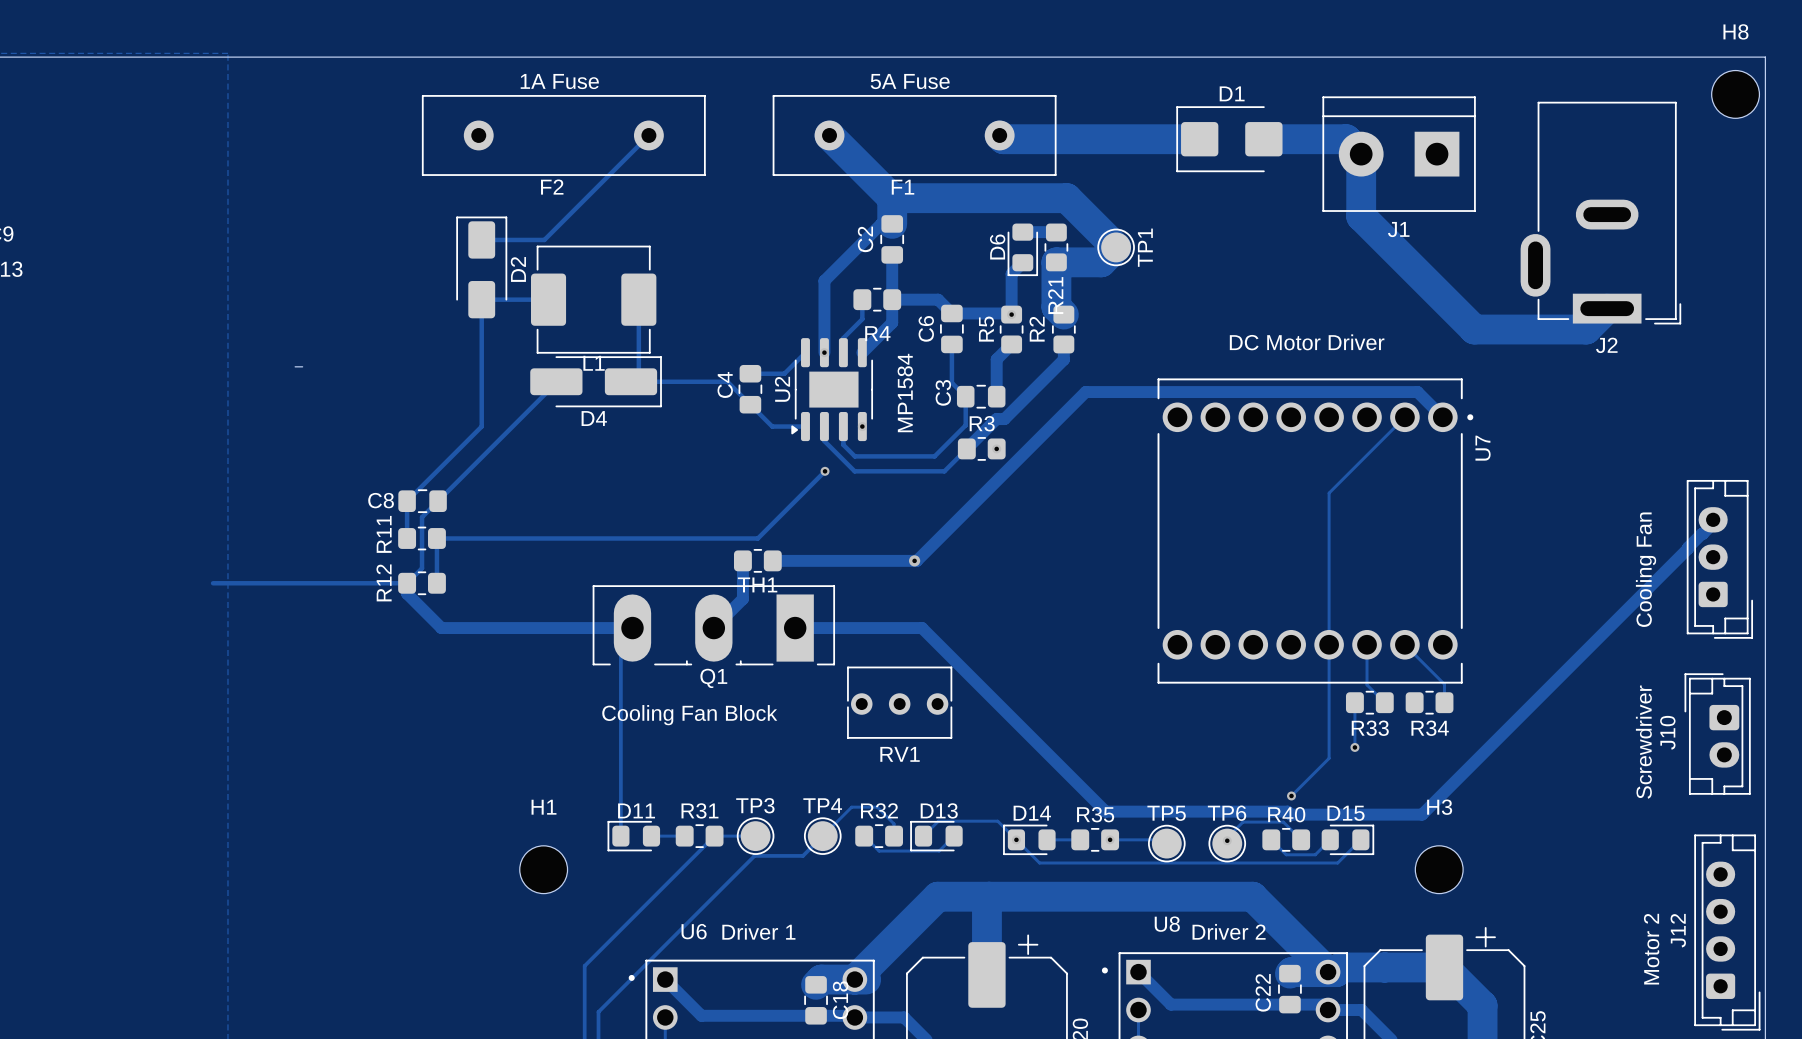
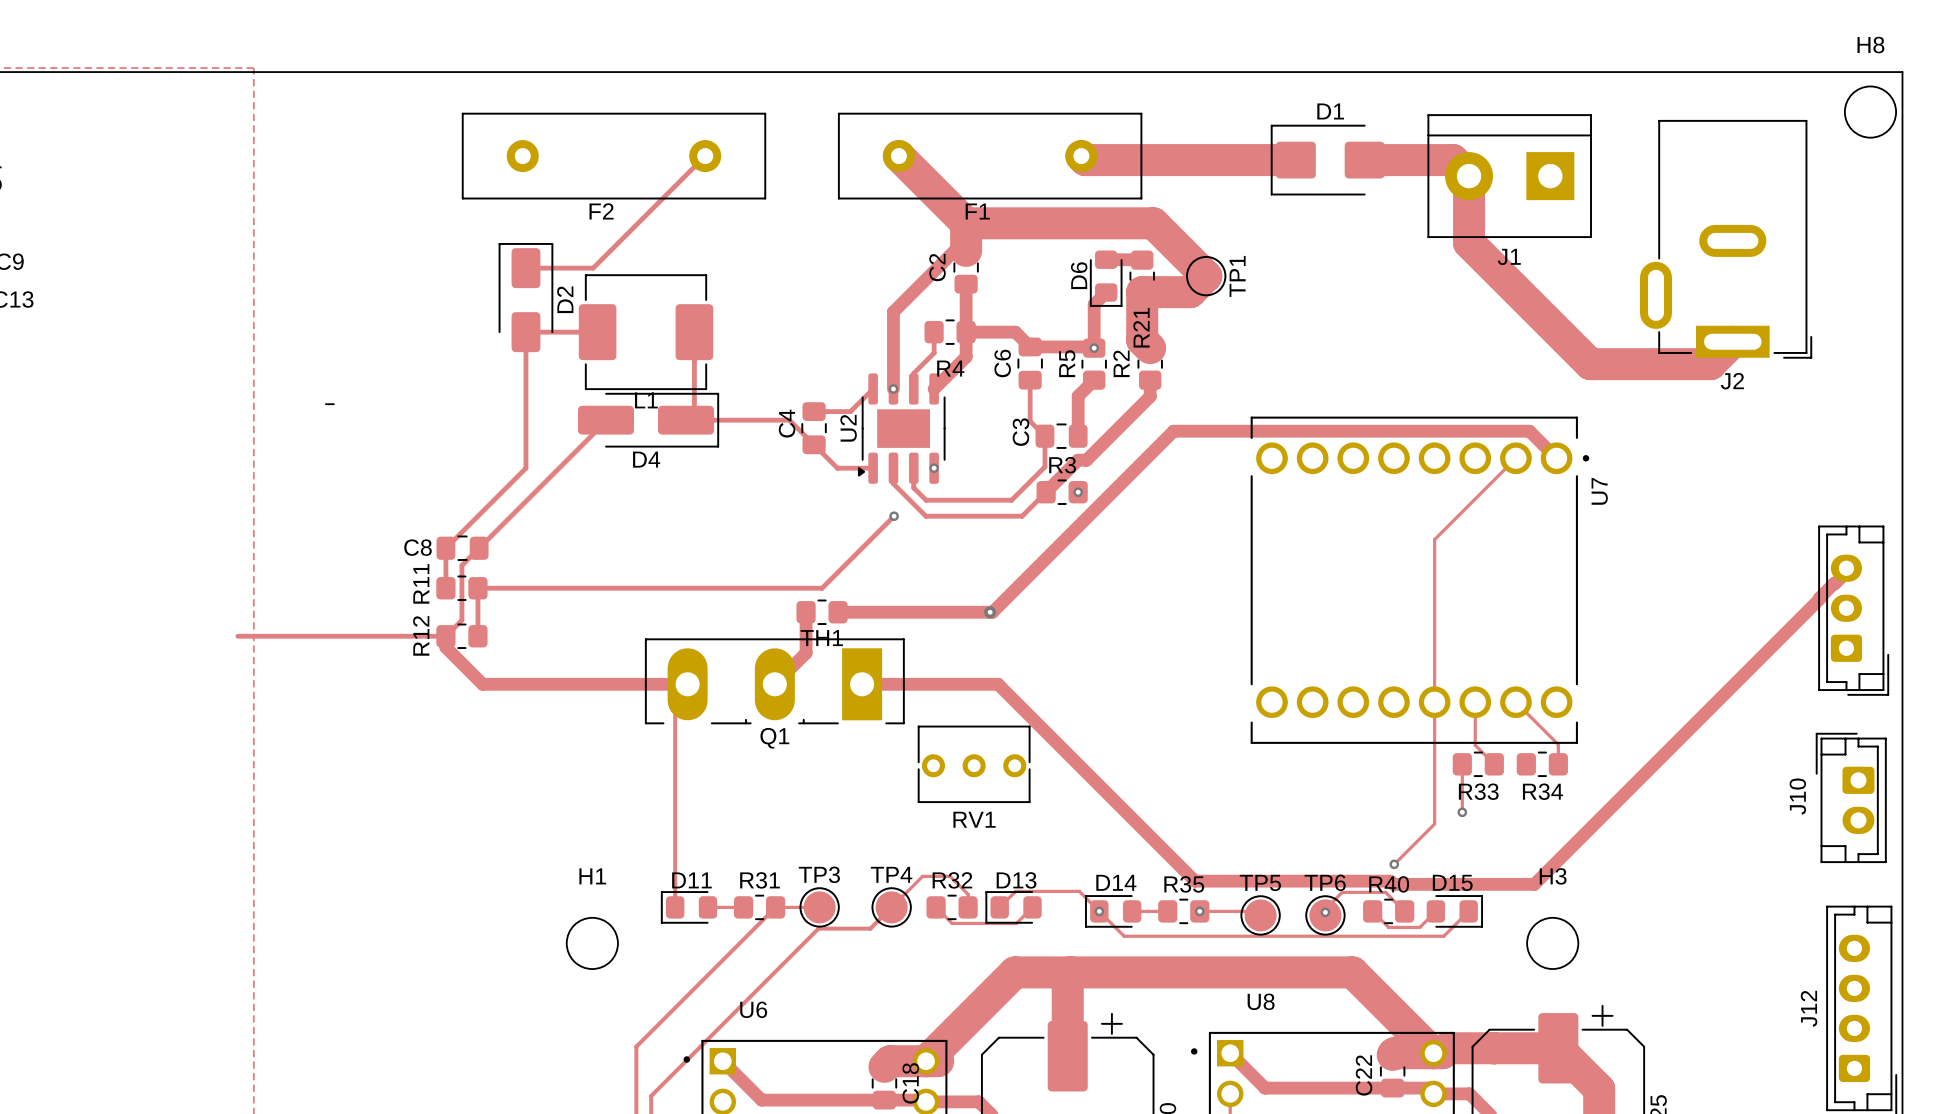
text: 1A Fuse (559, 81) -> none
text: 5A Fuse (910, 81) -> none
text: DC Motor Driver (1307, 342) -> none
text: MP1584 (905, 393) -> none
text: Cooling Fan (1646, 569) -> none
text: Cooling Fan Block (689, 715) -> none
text: Screwdriver (1643, 742) -> none
text: Driver 1 (758, 931) -> none
text: Driver 2 (1229, 931) -> none
text: Motor 2 (1651, 949) -> none

